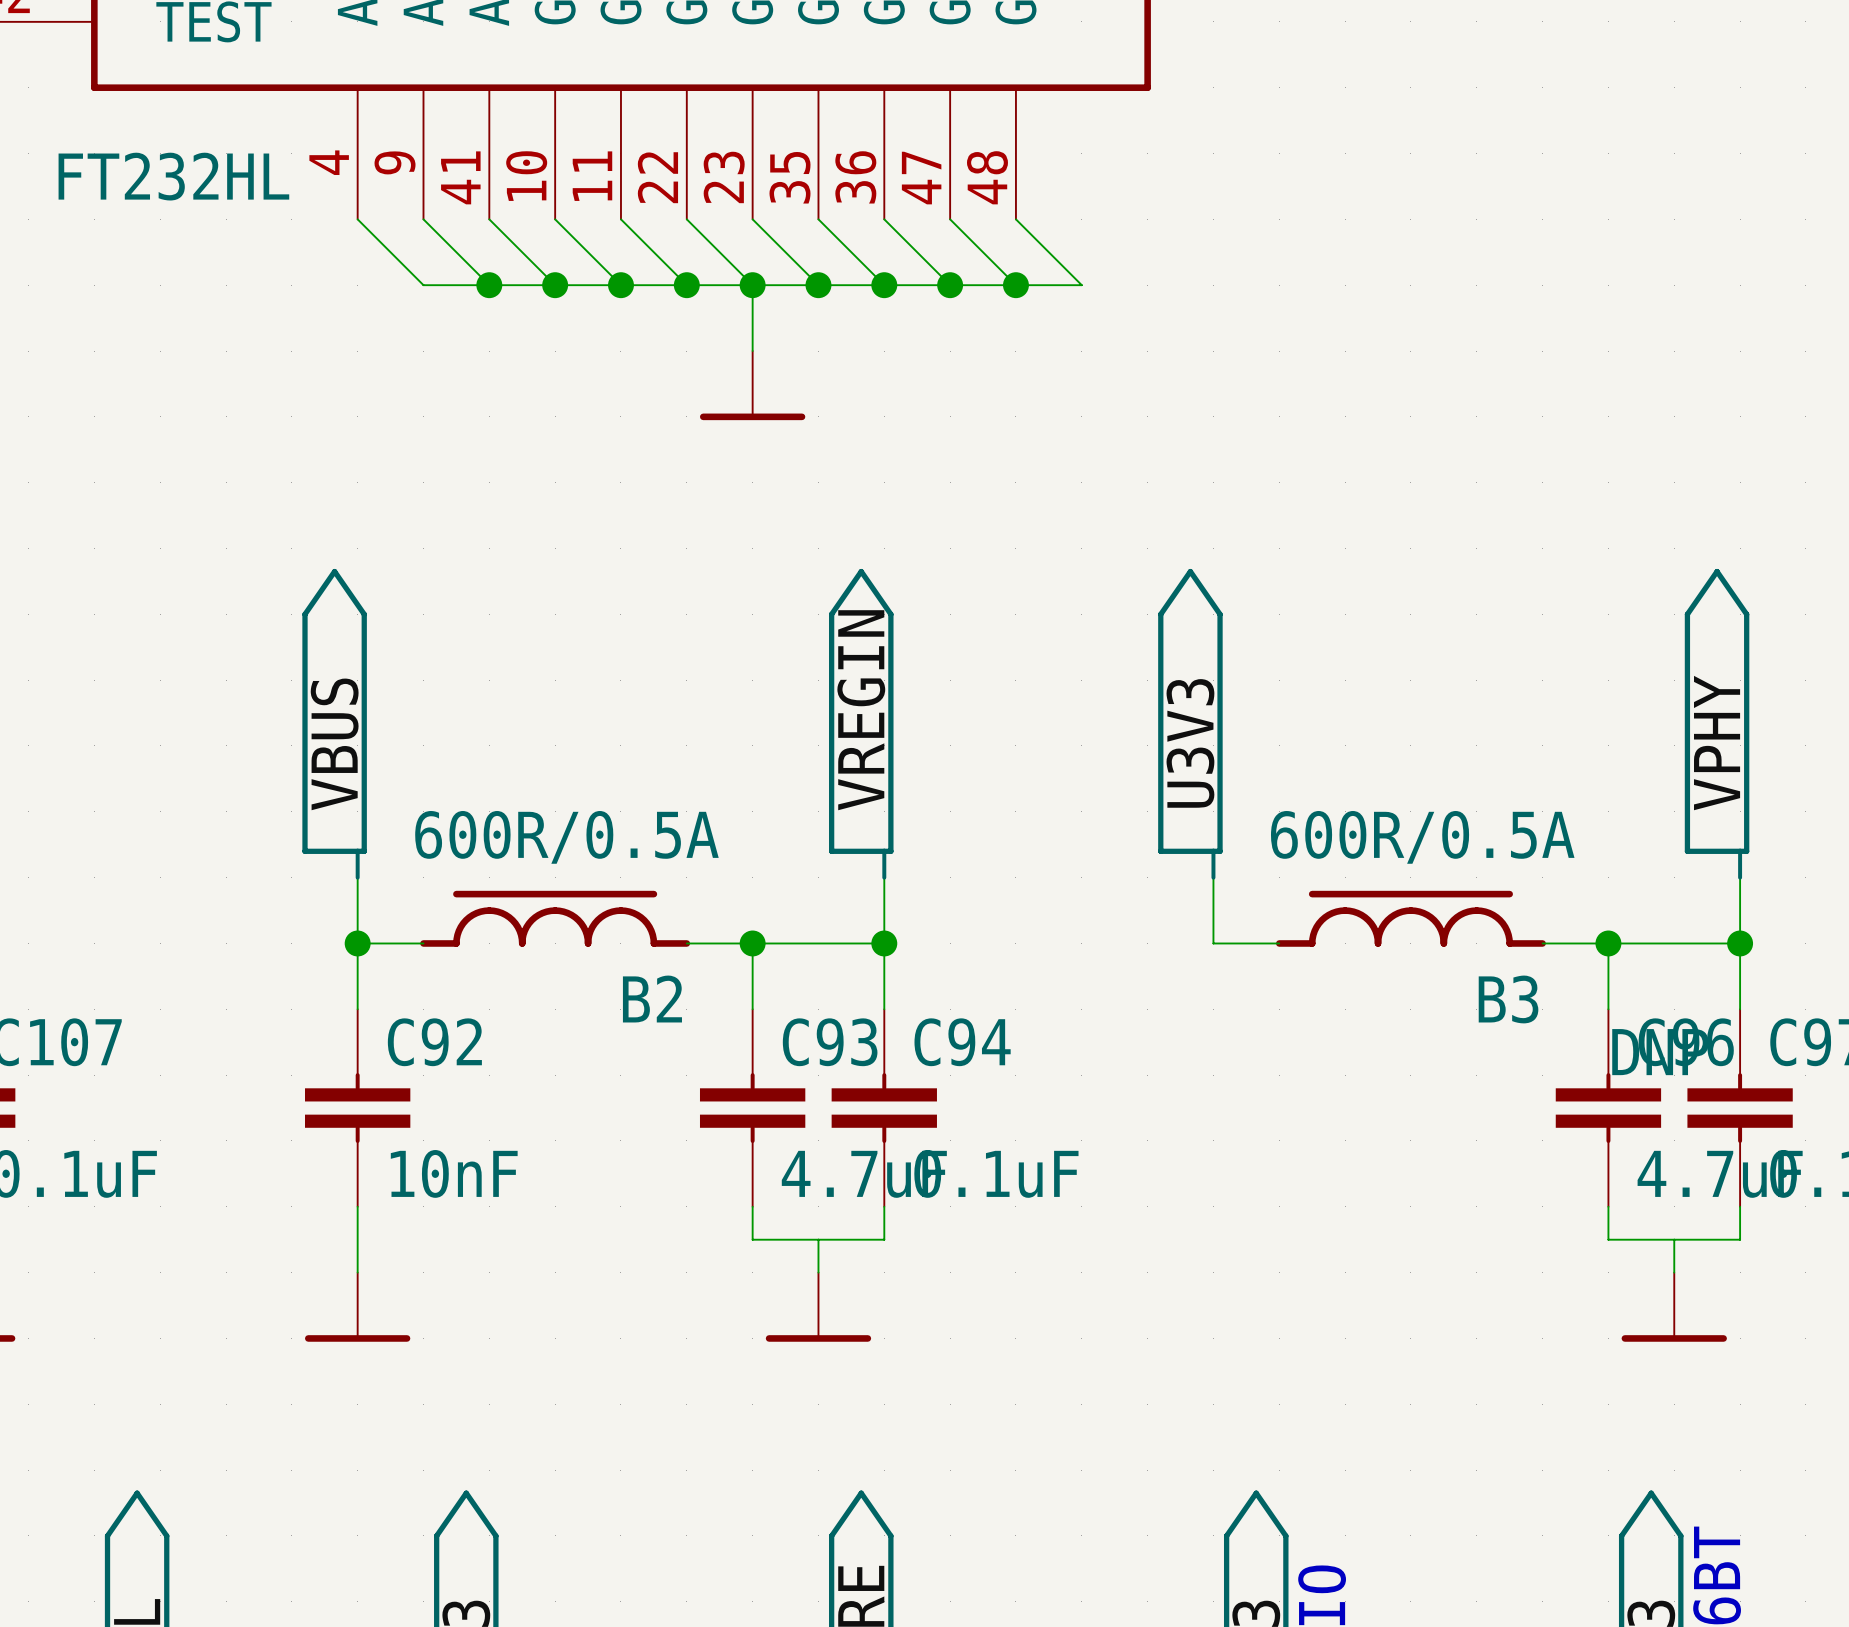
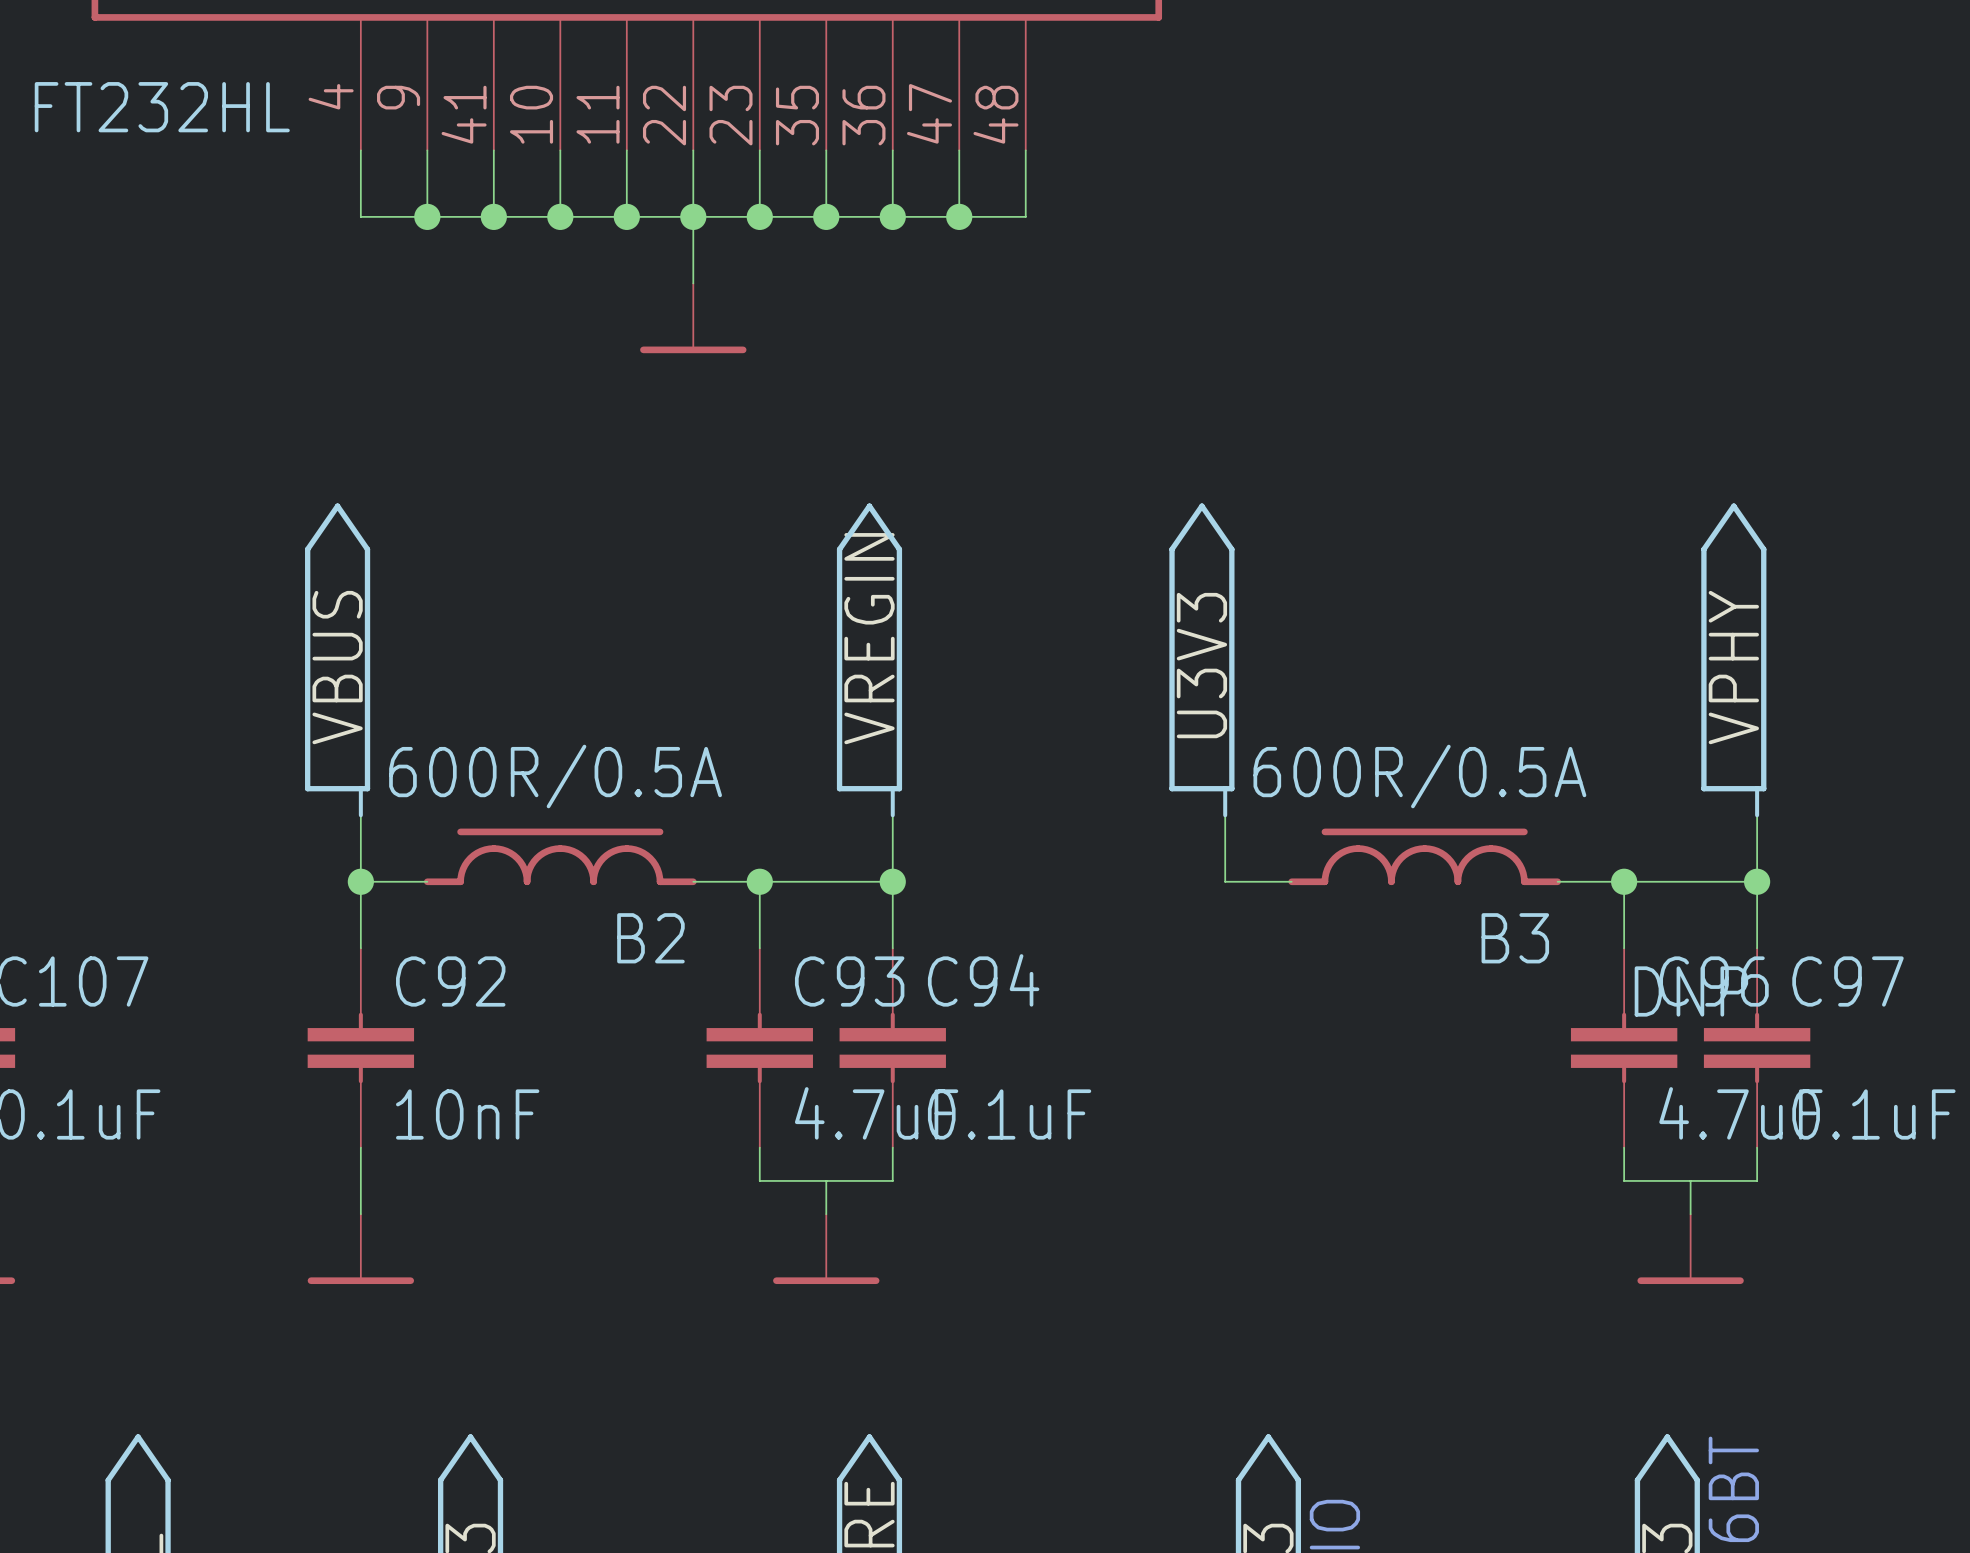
wire: (357, 219) (423, 285) -> (360, 150) (360, 216) (427, 216) (427, 150)
wire: (423, 219) (489, 285) -> (493, 150) (493, 216)
wire: (489, 219) (555, 285) -> (560, 150) (560, 216)
wire: (555, 219) (620, 285) -> (626, 150) (626, 216)
wire: (620, 219) (686, 285) -> none
wire: (686, 219) (752, 285) (752, 351) -> (693, 150) (693, 283)
wire: (752, 219) (818, 285) -> (759, 150) (759, 216)
wire: (818, 219) (884, 285) -> (826, 150) (826, 216)
wire: (884, 219) (950, 285) -> (892, 150) (892, 216)
wire: (950, 219) (1015, 285) (1081, 285) (1015, 219) -> (959, 150) (959, 216)
wire: none -> (1025, 150) (1025, 216)
junction: none -> (427, 216)
junction: (1015, 285) -> none
power symbol position: (752, 385) -> (693, 318)

